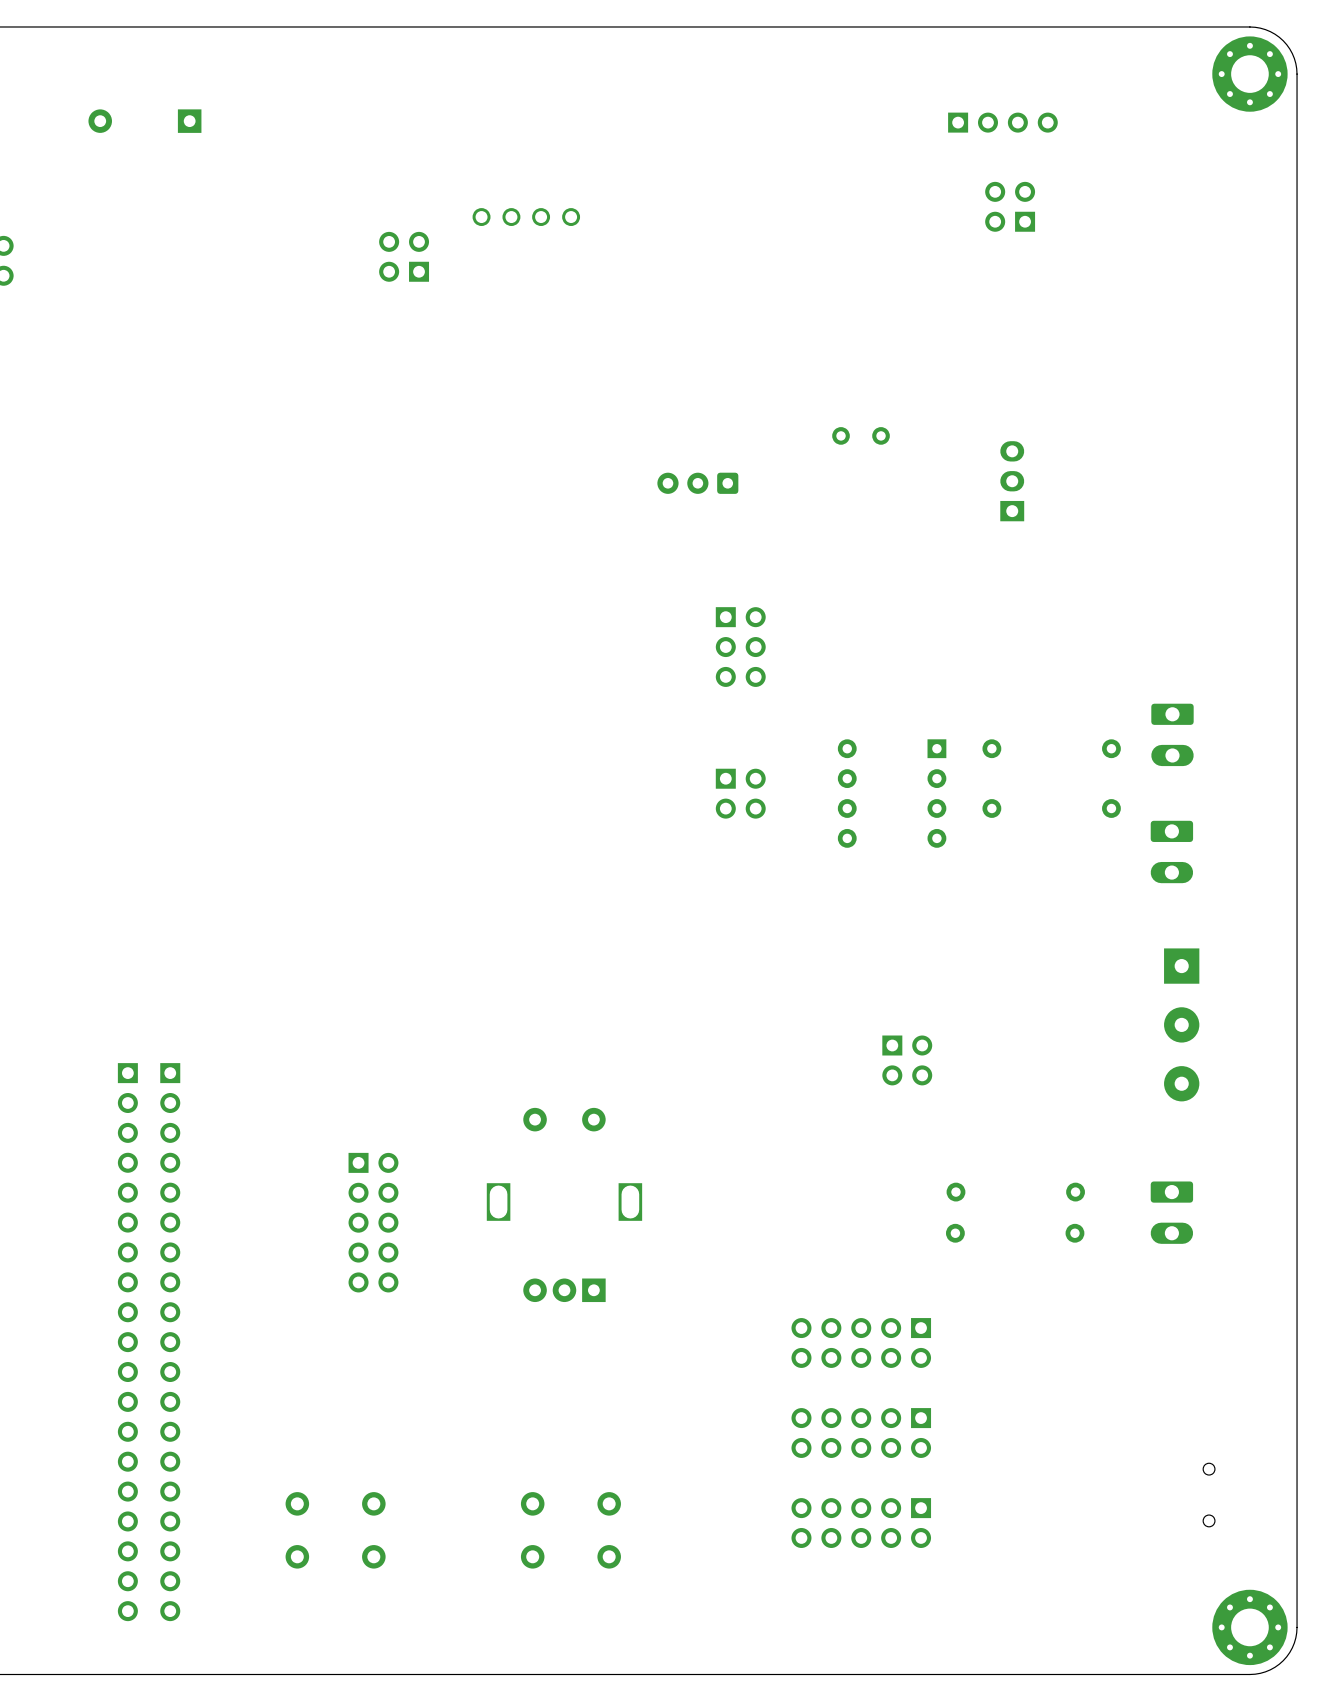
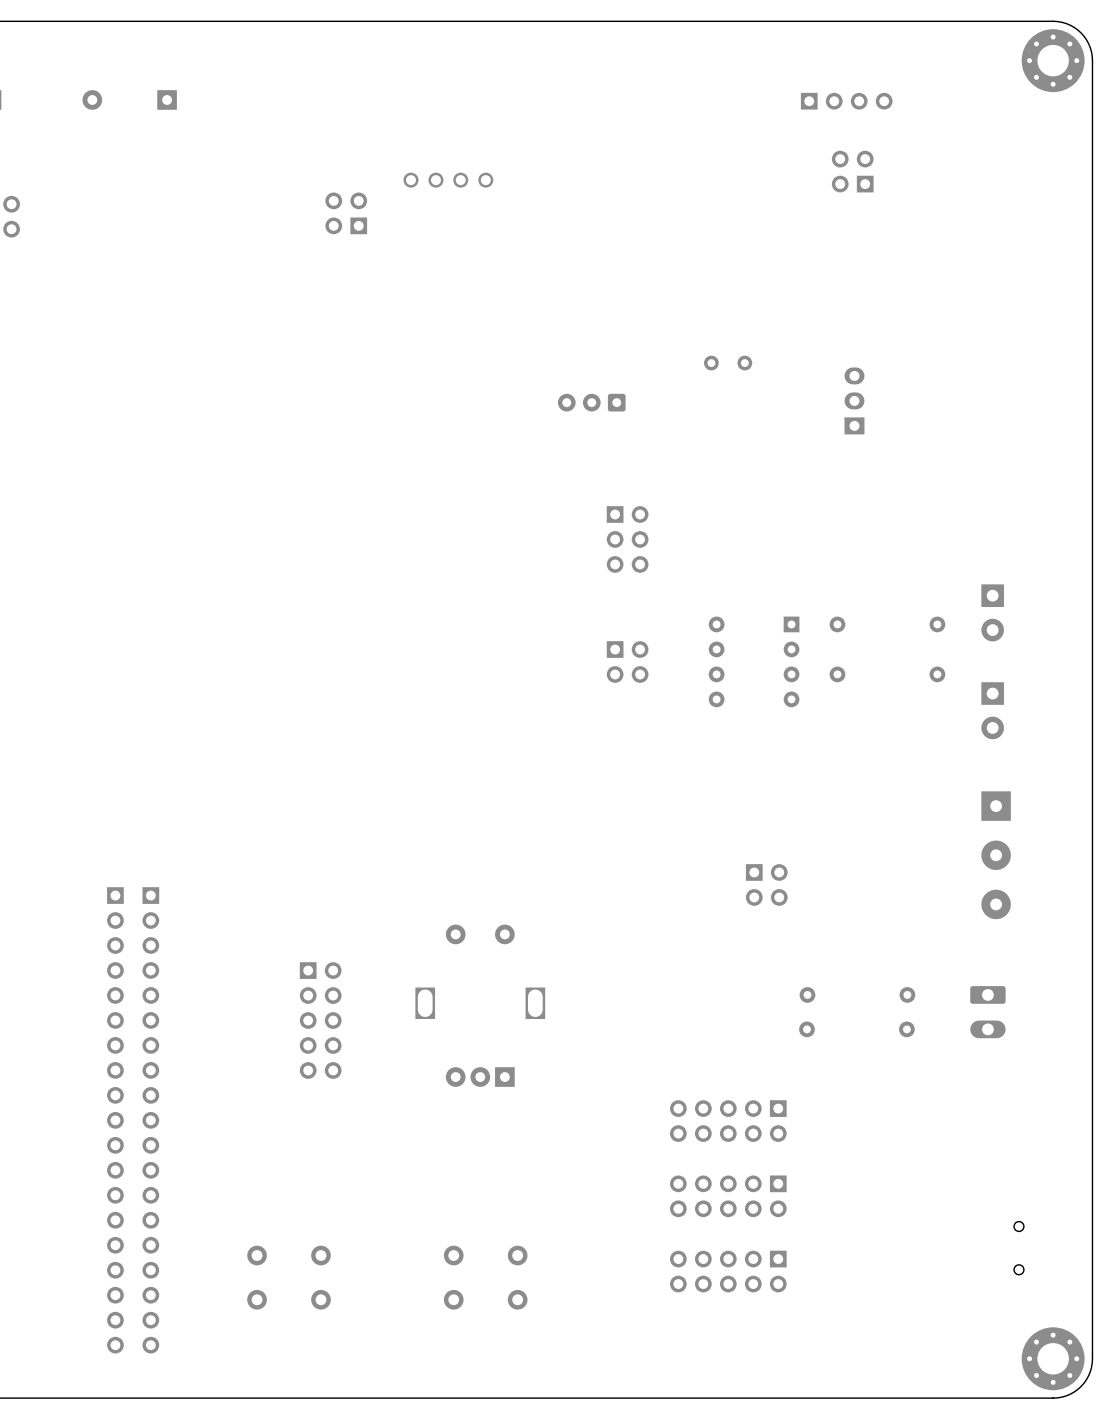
part footprint: [1151, 703, 1194, 767] -> [981, 584, 1004, 642]
part footprint: [1150, 820, 1194, 884] -> [981, 682, 1004, 740]

